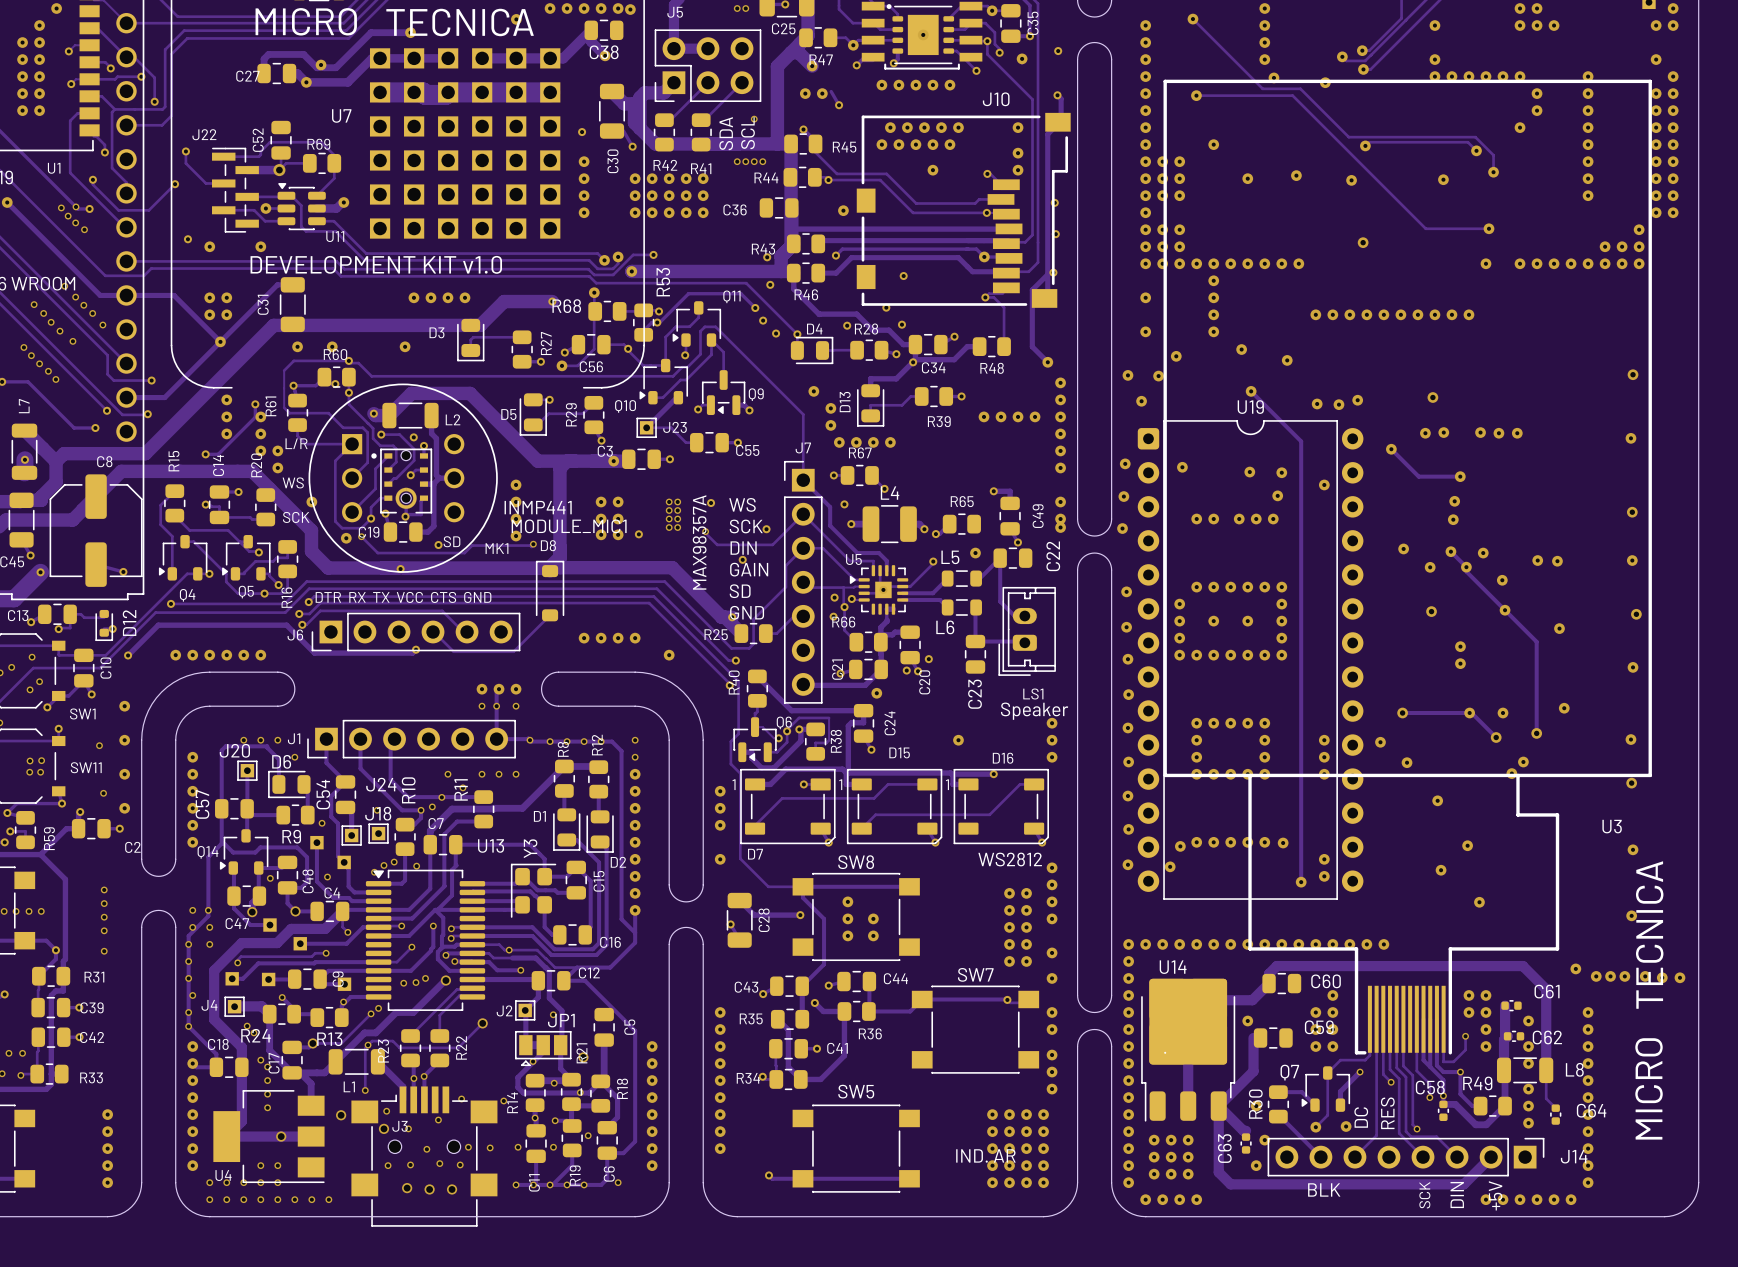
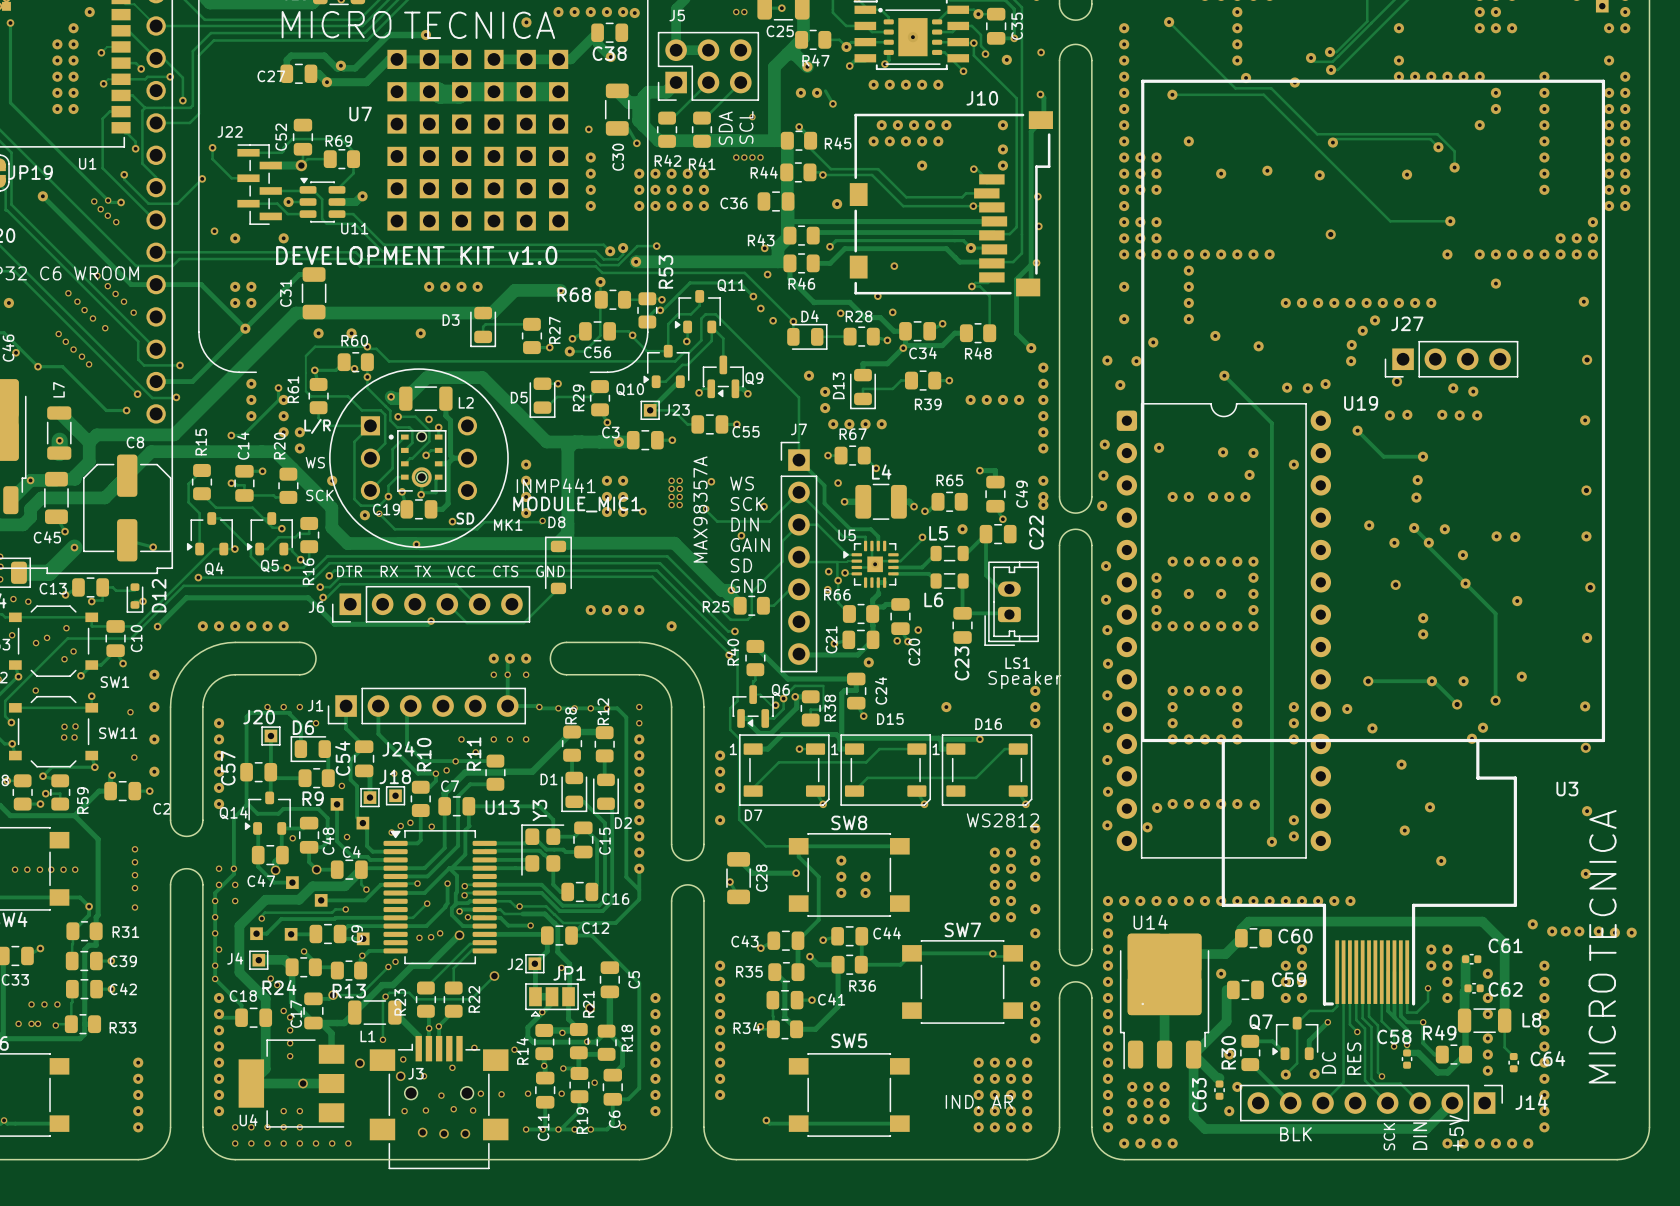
via: none -> (1495, 283)
via: none -> (1583, 301)
via: none -> (1375, 320)
via: none -> (1362, 330)
via: none -> (1351, 345)
J27: none -> (1451, 359)
via: none -> (1351, 361)
via: none -> (1453, 388)
U19 name position: U19 (1250, 407) -> U19 (1361, 403)
via: none -> (1473, 391)

